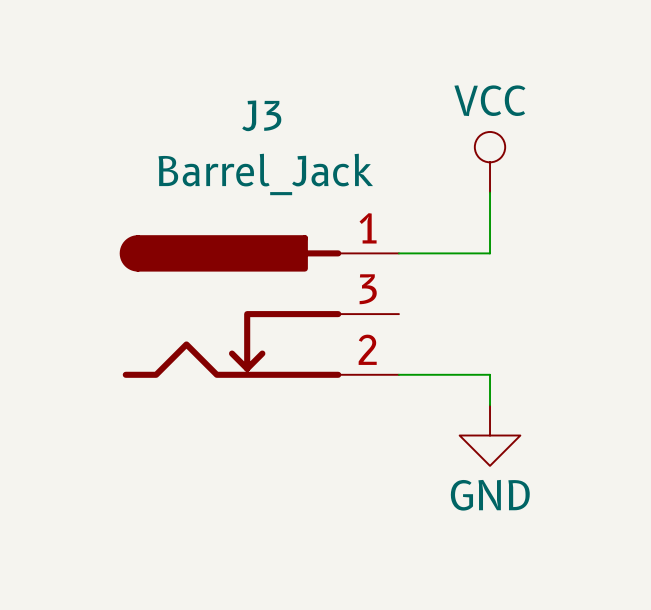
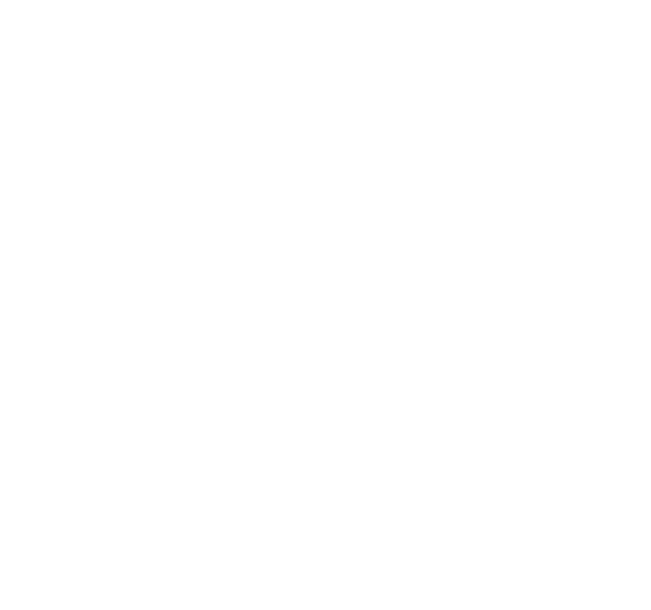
power symbol: VCC (490, 162) -> none
wire: (490, 192) (490, 253) (398, 253) -> none
J3: Barrel_Jack (259, 306) -> none
wire: (398, 374) (490, 374) (490, 405) -> none
power symbol: GND (490, 435) -> none

